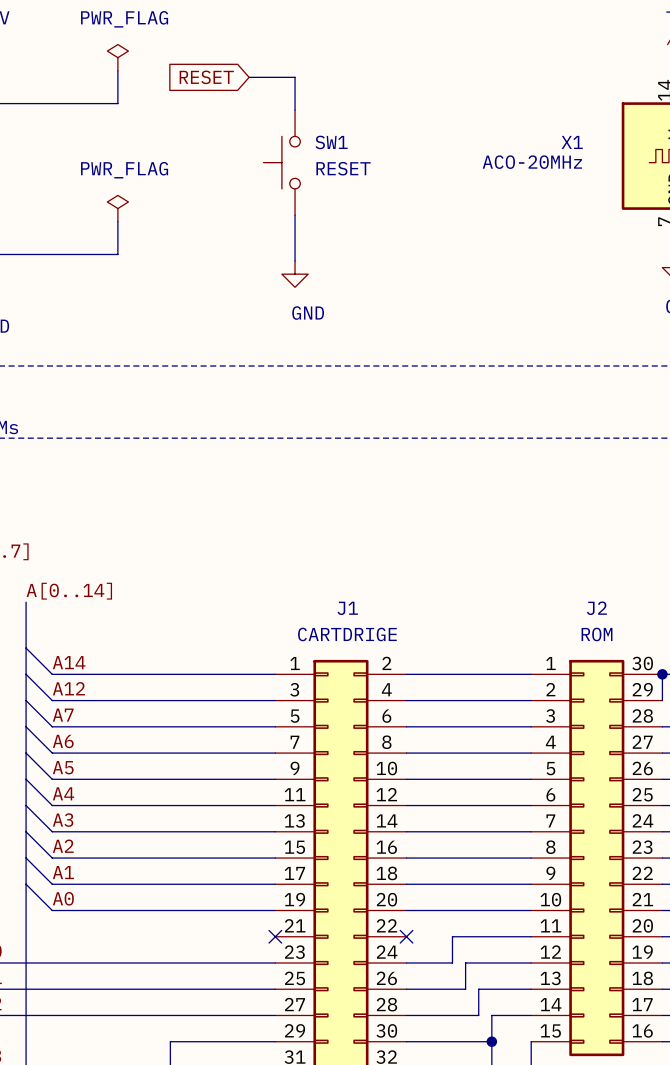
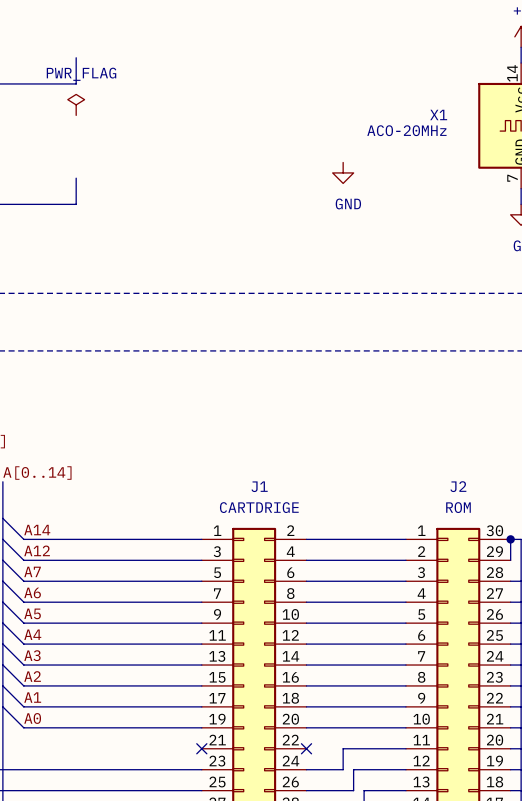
power symbol: PWR_FLAG (117, 57) -> none
global label: RESET (206, 77) -> none
wire: (249, 77) (295, 77) (295, 110) -> none
power symbol: none -> PWR_FLAG (76, 104)
SW1: RESET (281, 162) -> none
power symbol: PWR_FLAG (117, 208) -> none
wire: (295, 215) (295, 261) -> none
power symbol position: GND (295, 274) -> GND (343, 172)
power symbol text position: GND (308, 313) -> GND (348, 203)

